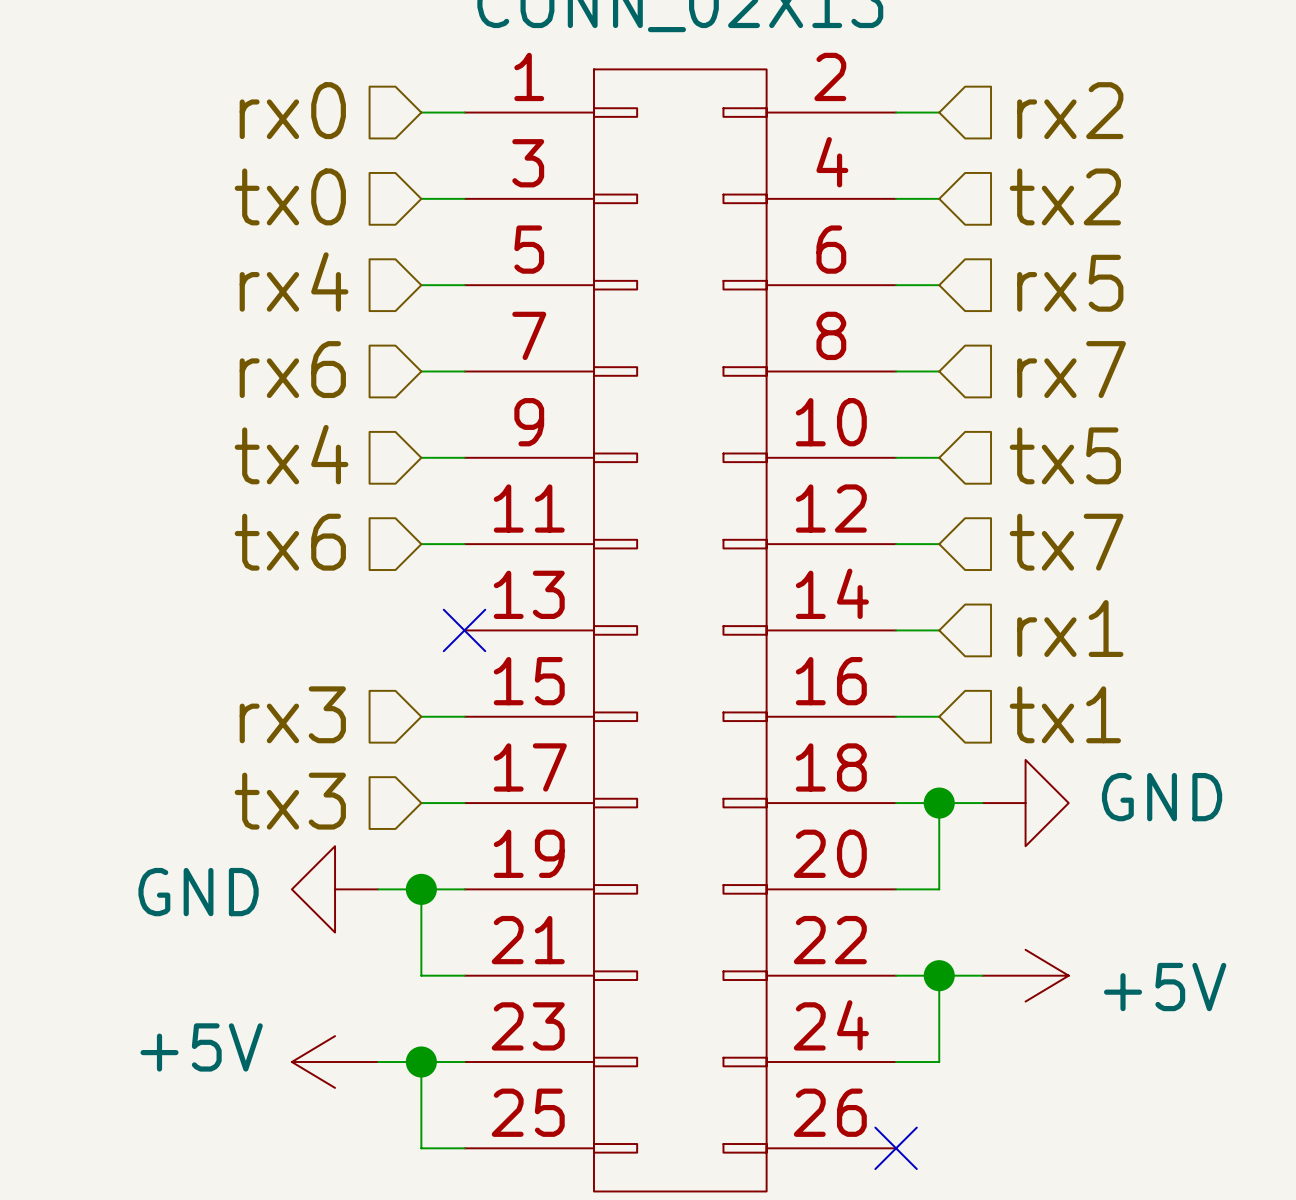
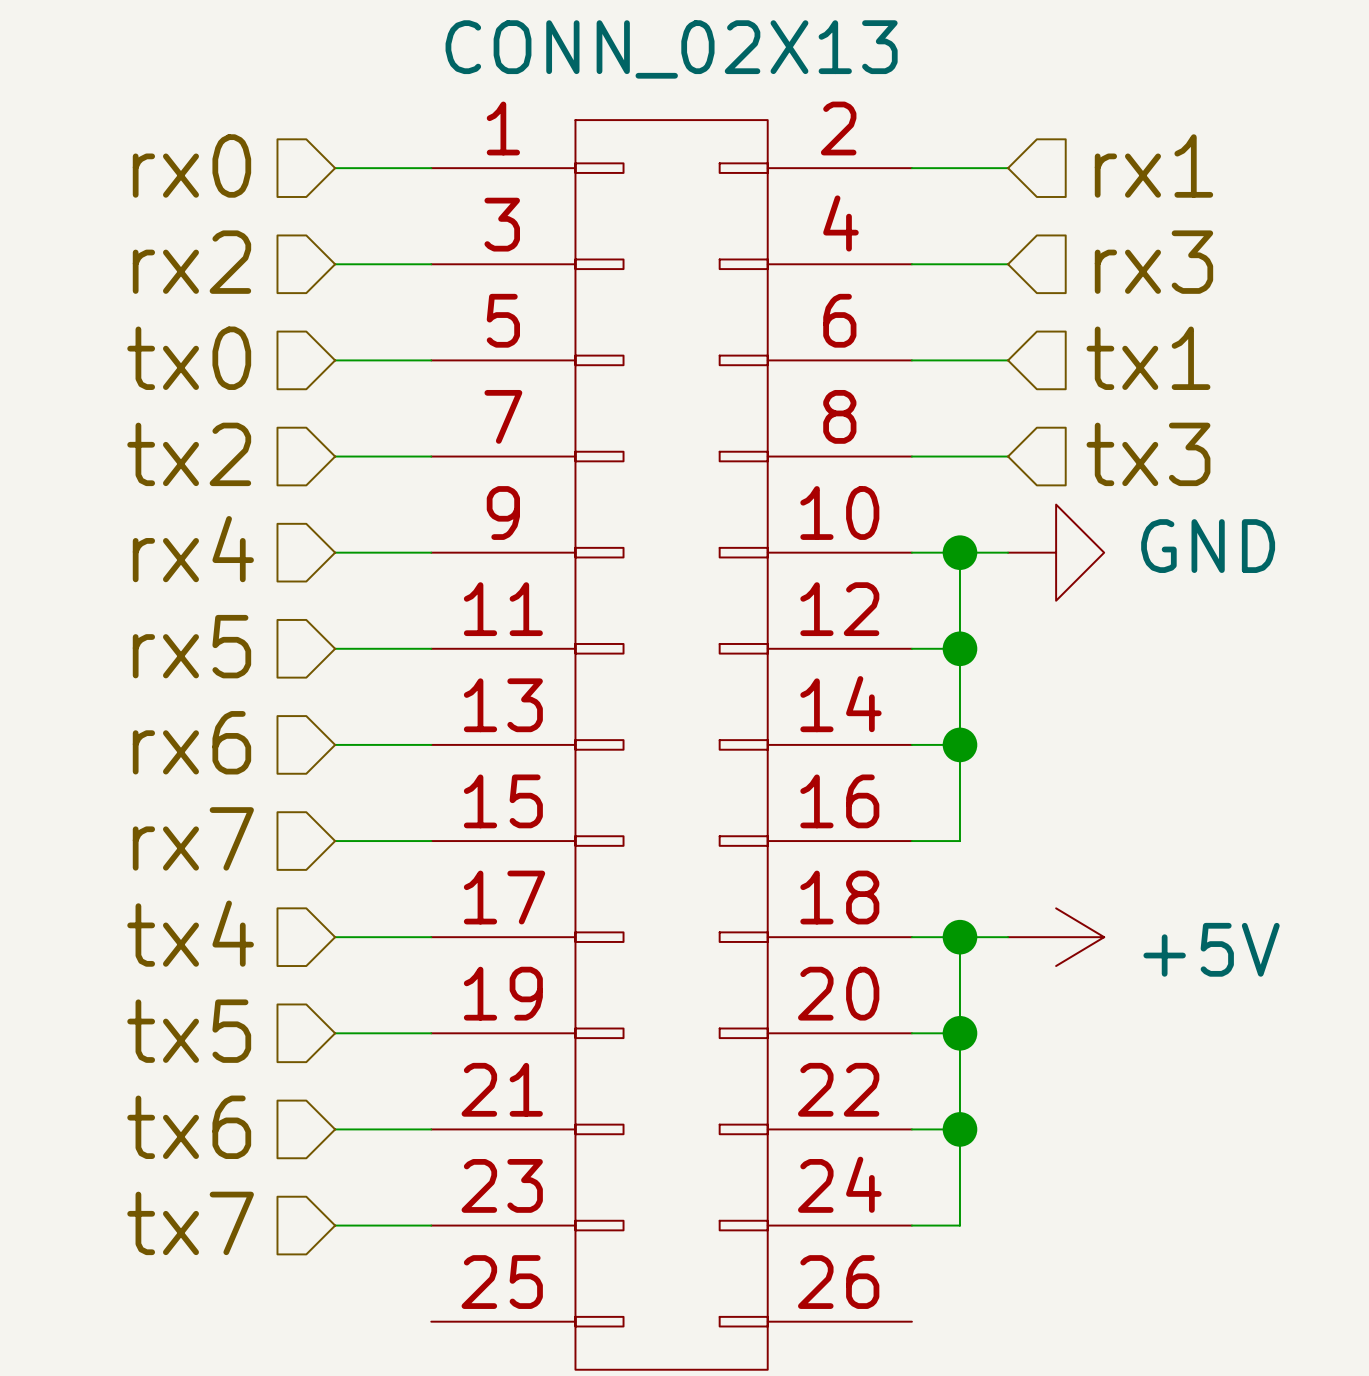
hierarchical label position: rx0 (292, 110) -> rx0 (191, 165)
hierarchical label rotation: 0° (1070, 110) -> 180° (191, 262)
hierarchical label position: rx2 (1070, 110) -> rx2 (191, 262)
wire: none -> (335, 168) (383, 168)
wire: none -> (959, 168) (1008, 168)
hierarchical label position: tx0 (290, 196) -> tx0 (189, 358)
hierarchical label rotation: 0° (1065, 196) -> 180° (189, 454)
hierarchical label position: tx2 (1065, 196) -> tx2 (189, 454)
hierarchical label: none -> rx3 (1153, 262)
wire: none -> (335, 264) (383, 264)
wire: none -> (959, 264) (1008, 264)
hierarchical label position: rx4 (294, 282) -> rx4 (193, 549)
hierarchical label rotation: 0° (1070, 283) -> 180° (191, 646)
hierarchical label position: rx5 (1070, 283) -> rx5 (191, 646)
wire: none -> (335, 360) (383, 360)
wire: none -> (959, 360) (1008, 360)
hierarchical label position: rx6 (292, 369) -> rx6 (191, 742)
hierarchical label rotation: 0° (1071, 369) -> 180° (193, 838)
hierarchical label position: rx7 (1071, 369) -> rx7 (193, 838)
wire: none -> (335, 456) (383, 456)
wire: none -> (959, 456) (1008, 456)
hierarchical label position: tx4 (291, 454) -> tx4 (190, 933)
hierarchical label rotation: 0° (1065, 455) -> 180° (189, 1031)
hierarchical label position: tx5 (1065, 455) -> tx5 (189, 1031)
wire: none -> (335, 552) (383, 552)
junction: none -> (959, 552)
wire: none -> (1008, 552) (959, 552) (959, 841)
hierarchical label position: tx6 (290, 542) -> tx6 (189, 1127)
hierarchical label: tx7 (1066, 542) -> none
wire: none -> (335, 648) (383, 648)
junction: none -> (959, 648)
hierarchical label position: rx1 (1070, 628) -> rx1 (1153, 165)
wire: none -> (335, 744) (431, 744)
no-connect mark: (464, 630) -> none
junction: none -> (959, 744)
hierarchical label: rx3 (292, 714) -> none
hierarchical label position: tx1 (1065, 714) -> tx1 (1148, 358)
wire: none -> (335, 841) (383, 841)
hierarchical label rotation: 0° (290, 801) -> 180° (1148, 454)
hierarchical label position: tx3 (290, 801) -> tx3 (1148, 454)
wire: none -> (335, 937) (383, 937)
power symbol: GND (1025, 803) -> +5V (1056, 937)
power symbol rotation: 0° (335, 889) -> 180° (1056, 552)
power symbol position: GND (335, 889) -> GND (1056, 552)
wire: (421, 889) (421, 975) -> (335, 1129) (383, 1129)
junction: (421, 889) -> none
junction: none -> (959, 1033)
wire: (939, 975) (982, 975) -> (959, 1129) (959, 1033)
power symbol: +5V (1025, 975) -> none
hierarchical label: none -> tx7 (190, 1223)
power symbol: +5V (335, 1062) -> none
wire: (421, 1062) (421, 1148) (464, 1148) -> none
junction: (421, 1062) -> none
no-connect mark: (896, 1148) -> none

